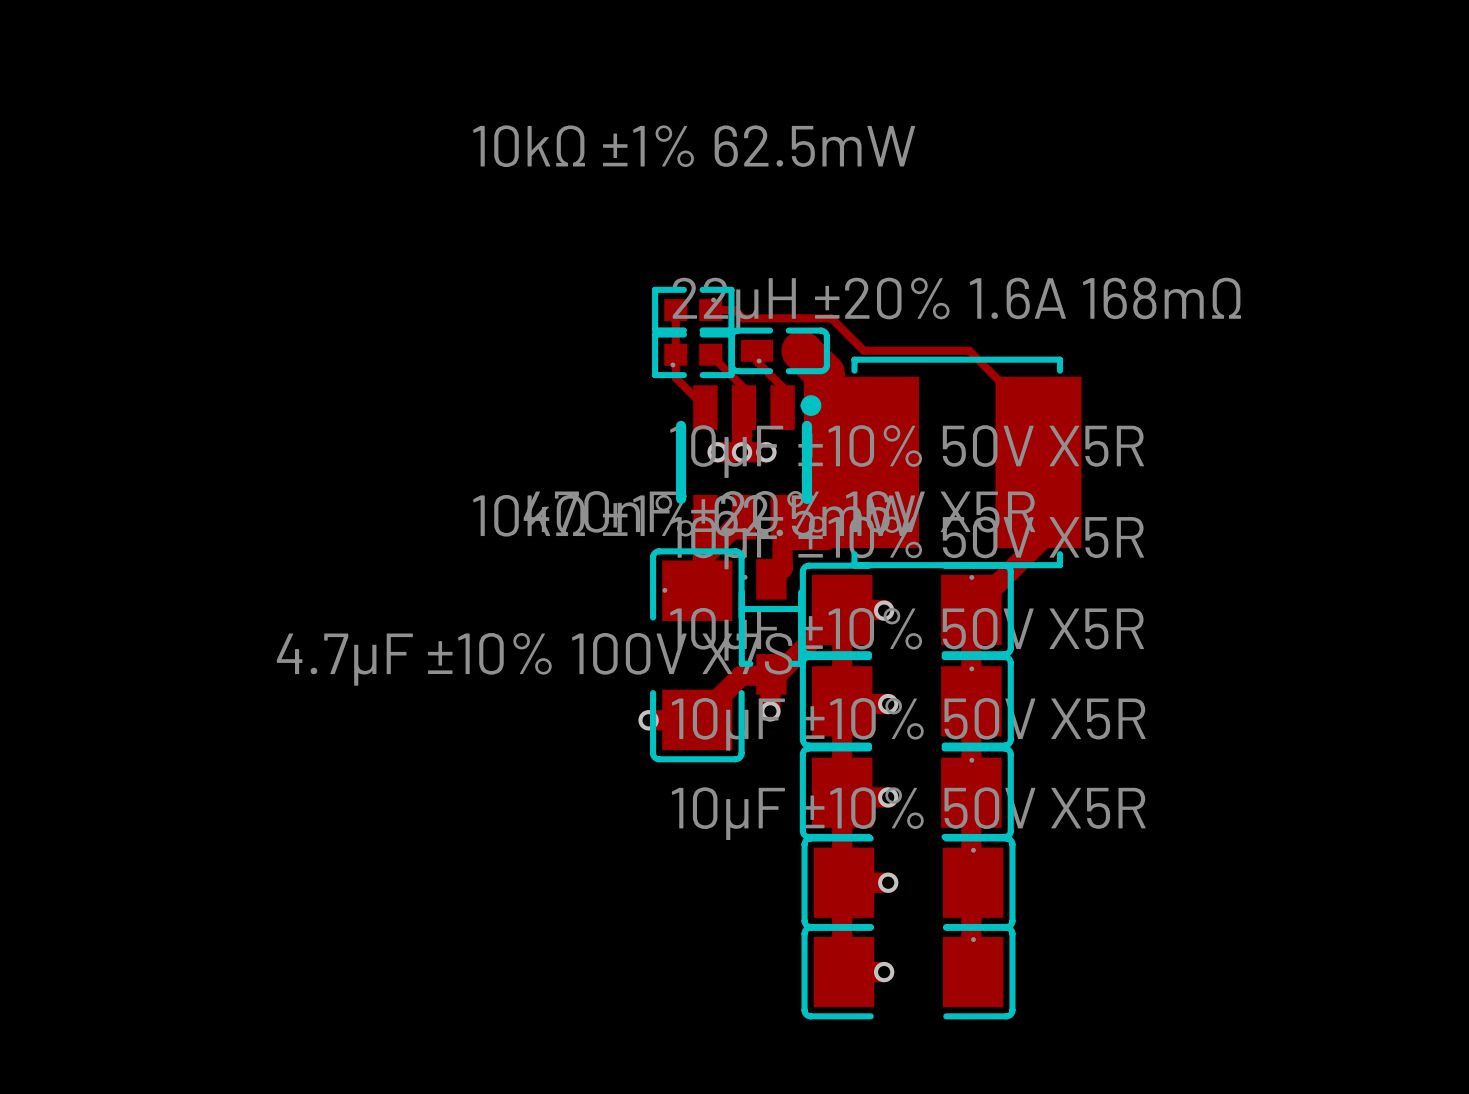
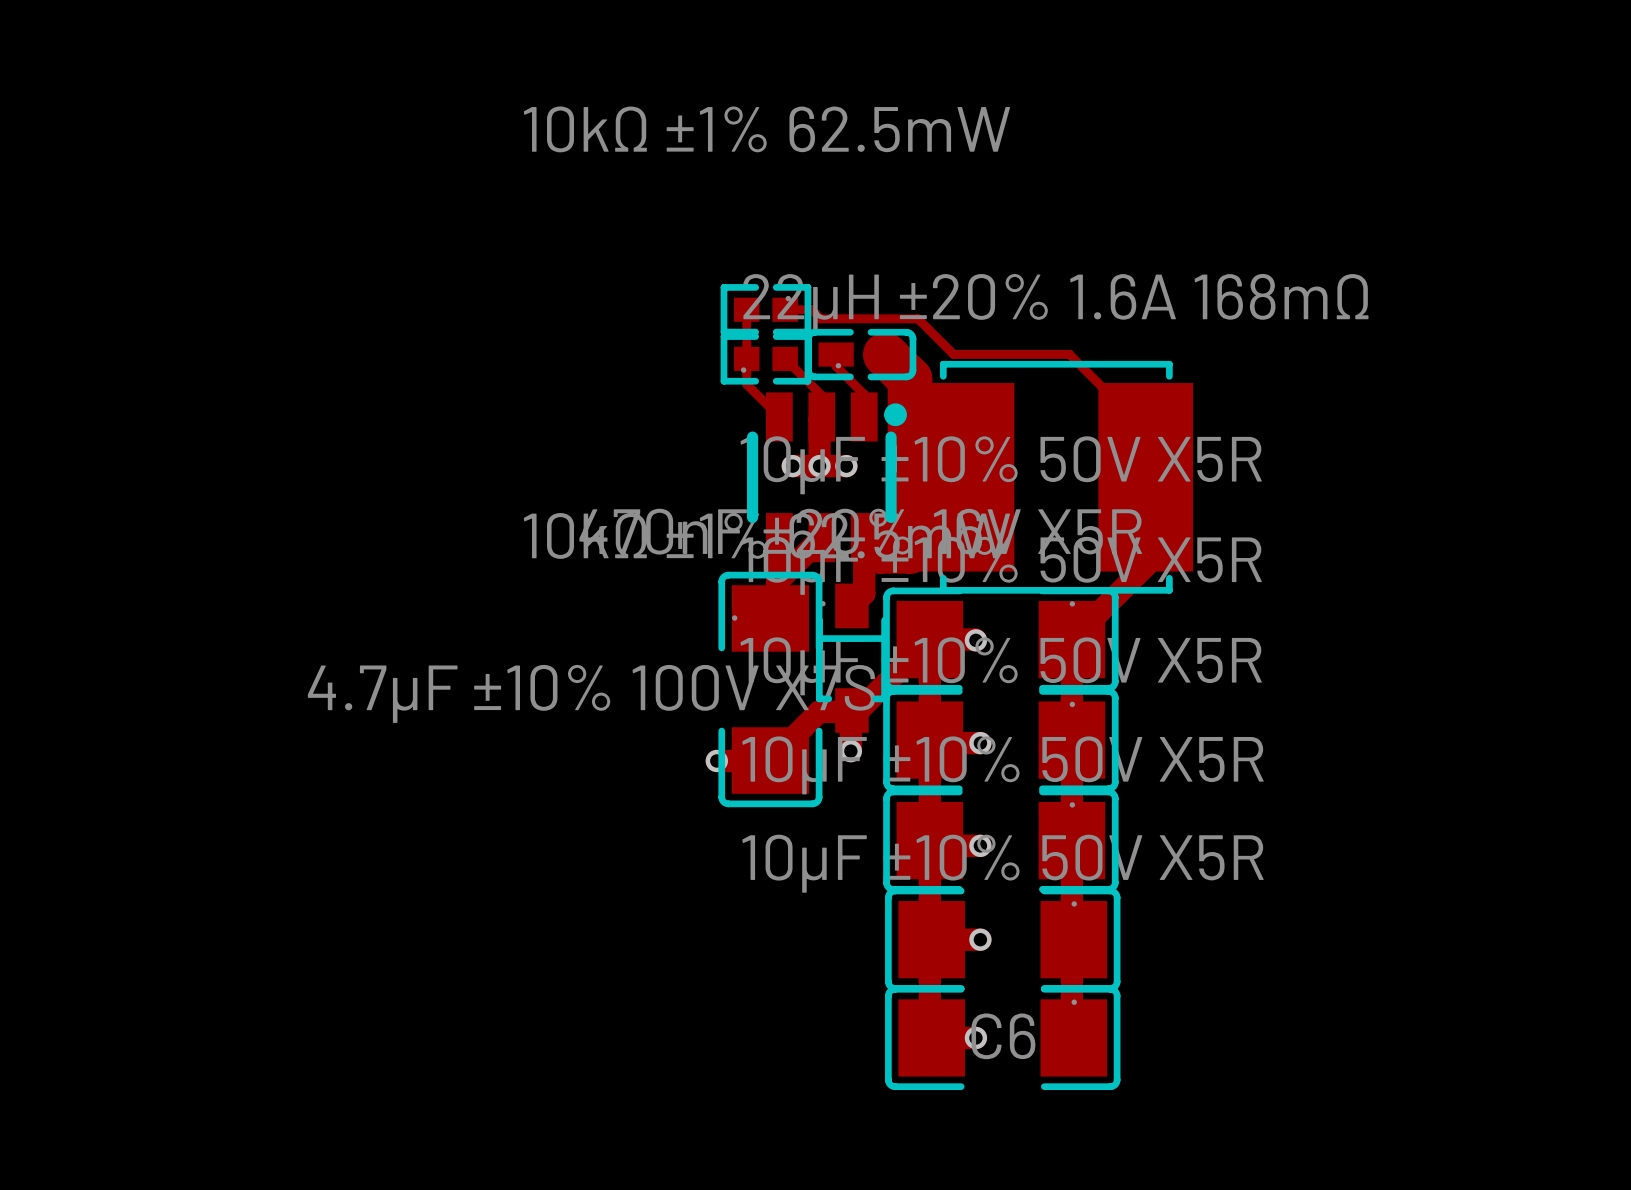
C6 name: none -> C6 (1003, 1036)

